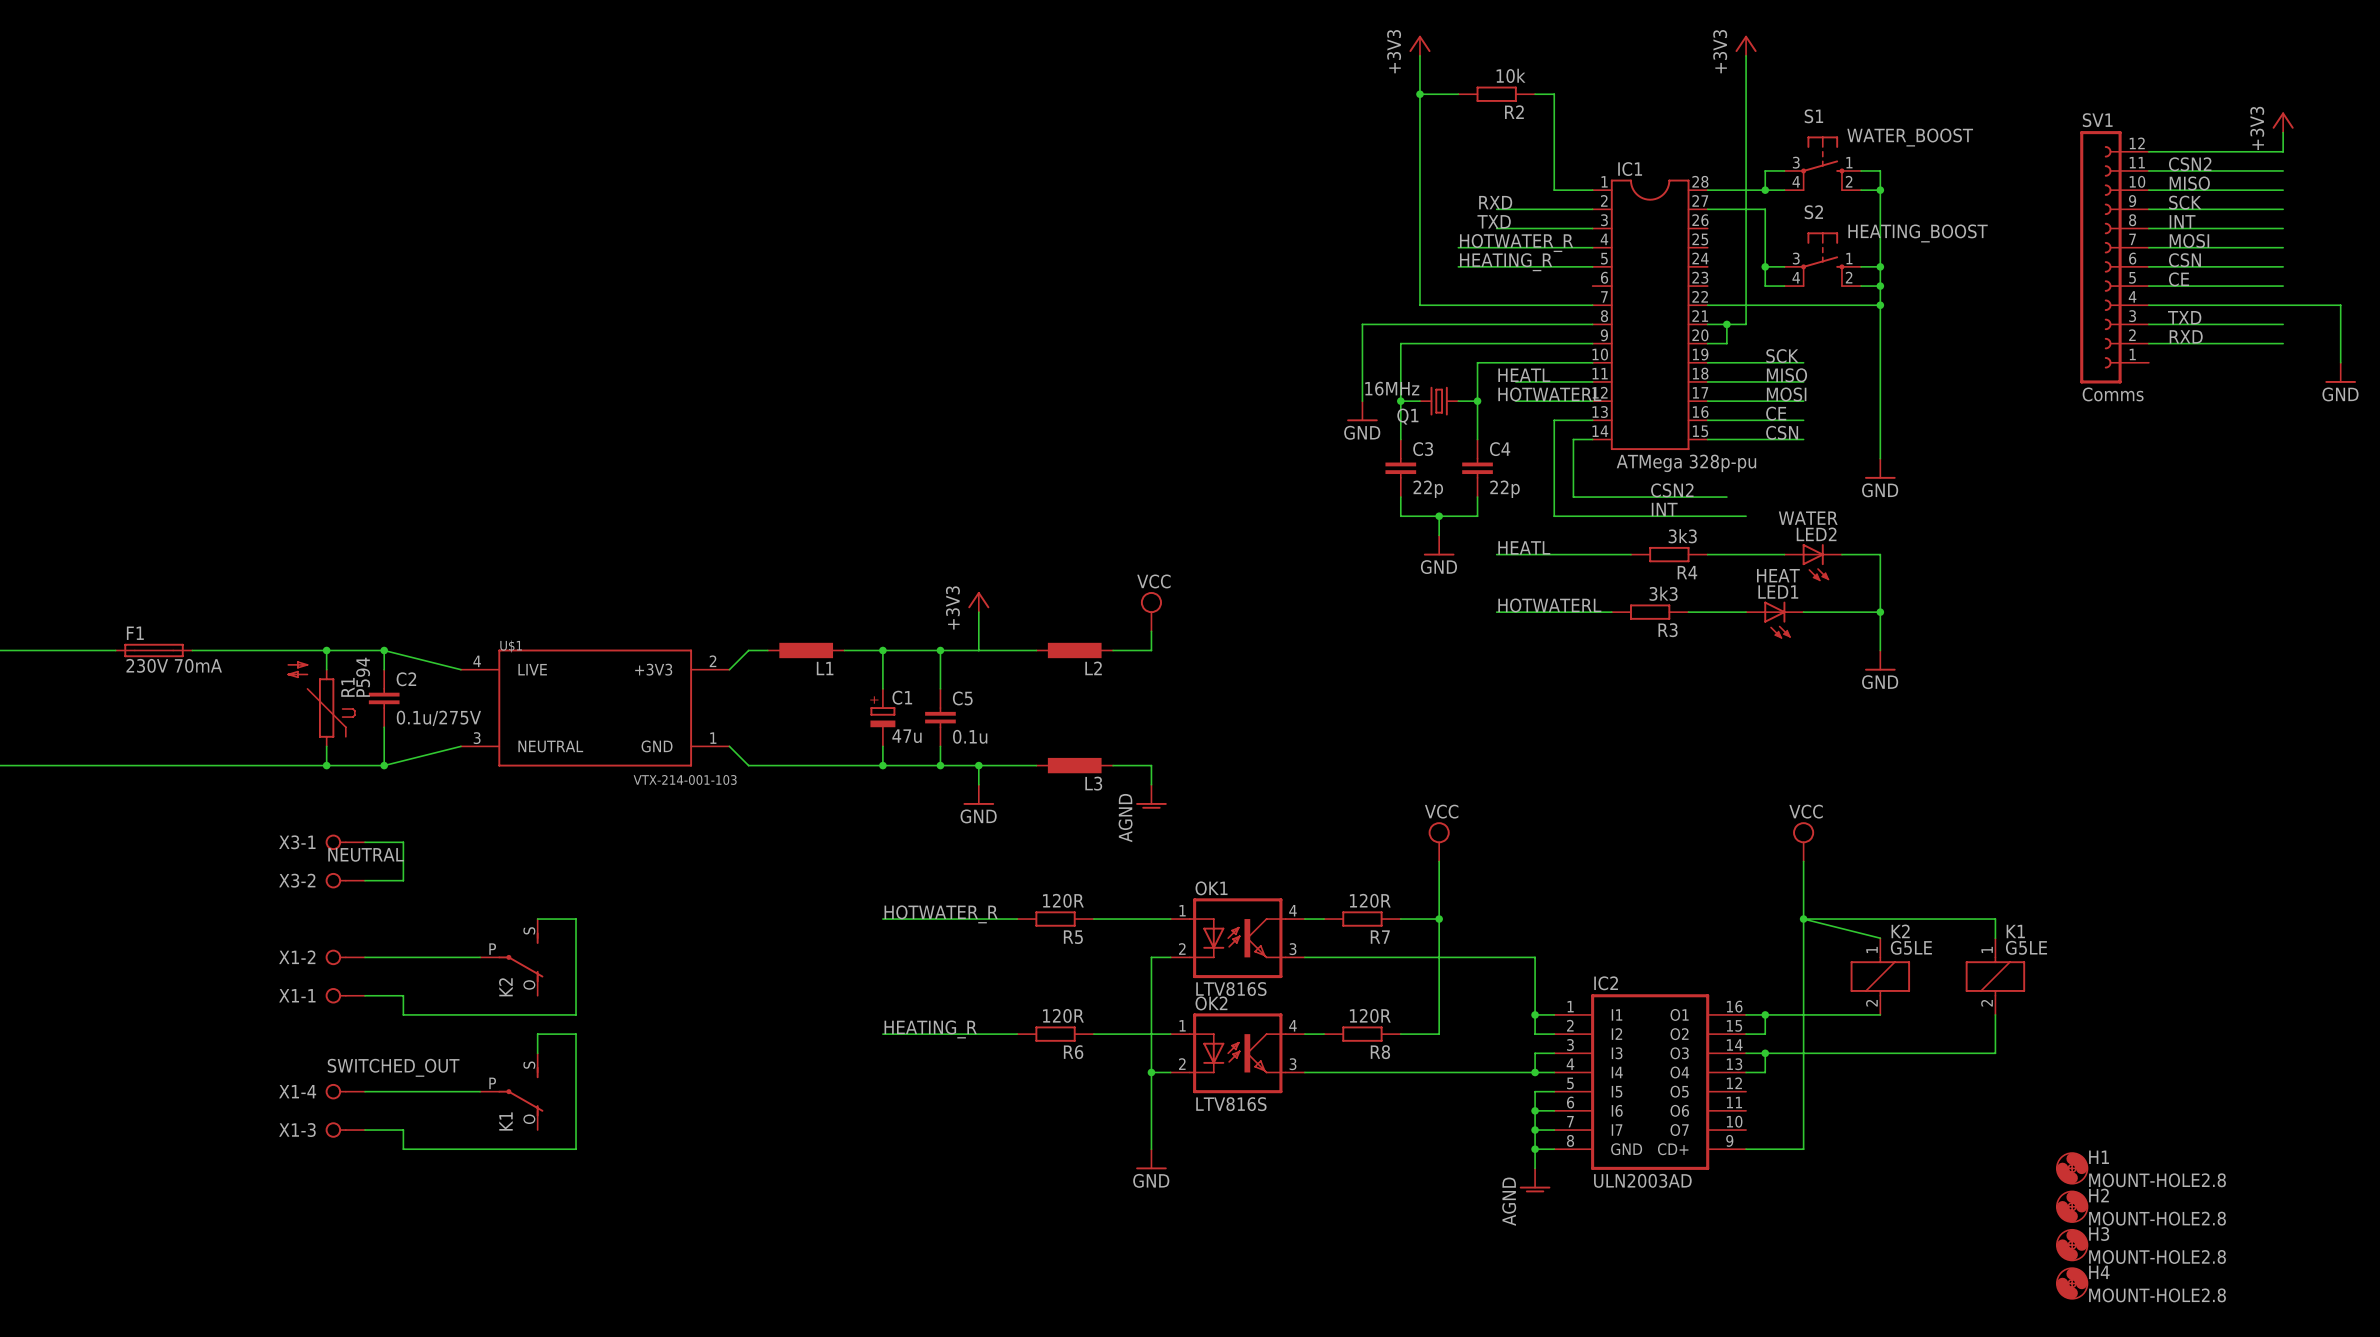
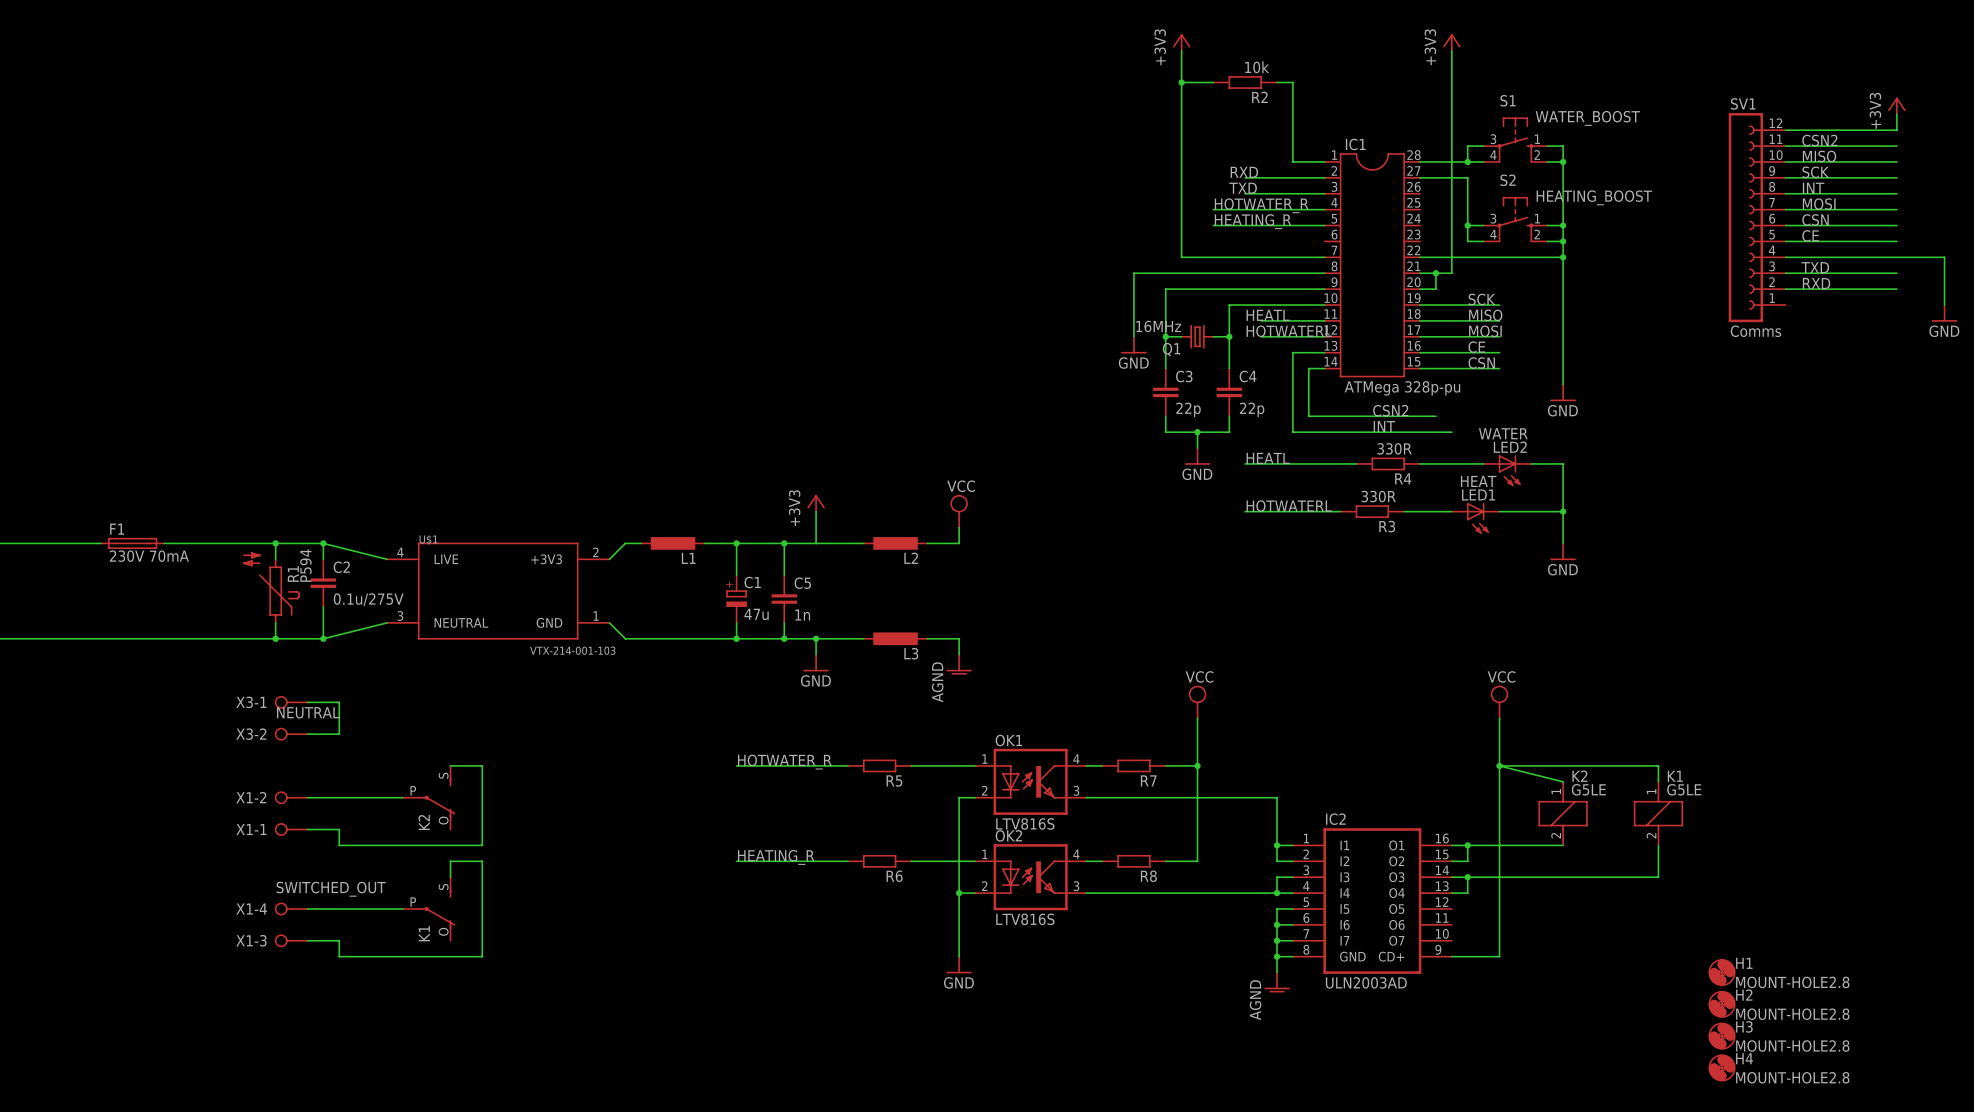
R4 value: 3k3 (1682, 536) -> 330R (1394, 448)
R3 value: 3k3 (1663, 593) -> 330R (1378, 496)
C5 value: 0.1u (970, 736) -> 1n (802, 614)
R5 value: 120R (1063, 900) -> none
R7 value: 120R (1370, 900) -> none
R6 value: 120R (1063, 1015) -> none
R8 value: 120R (1370, 1015) -> none

